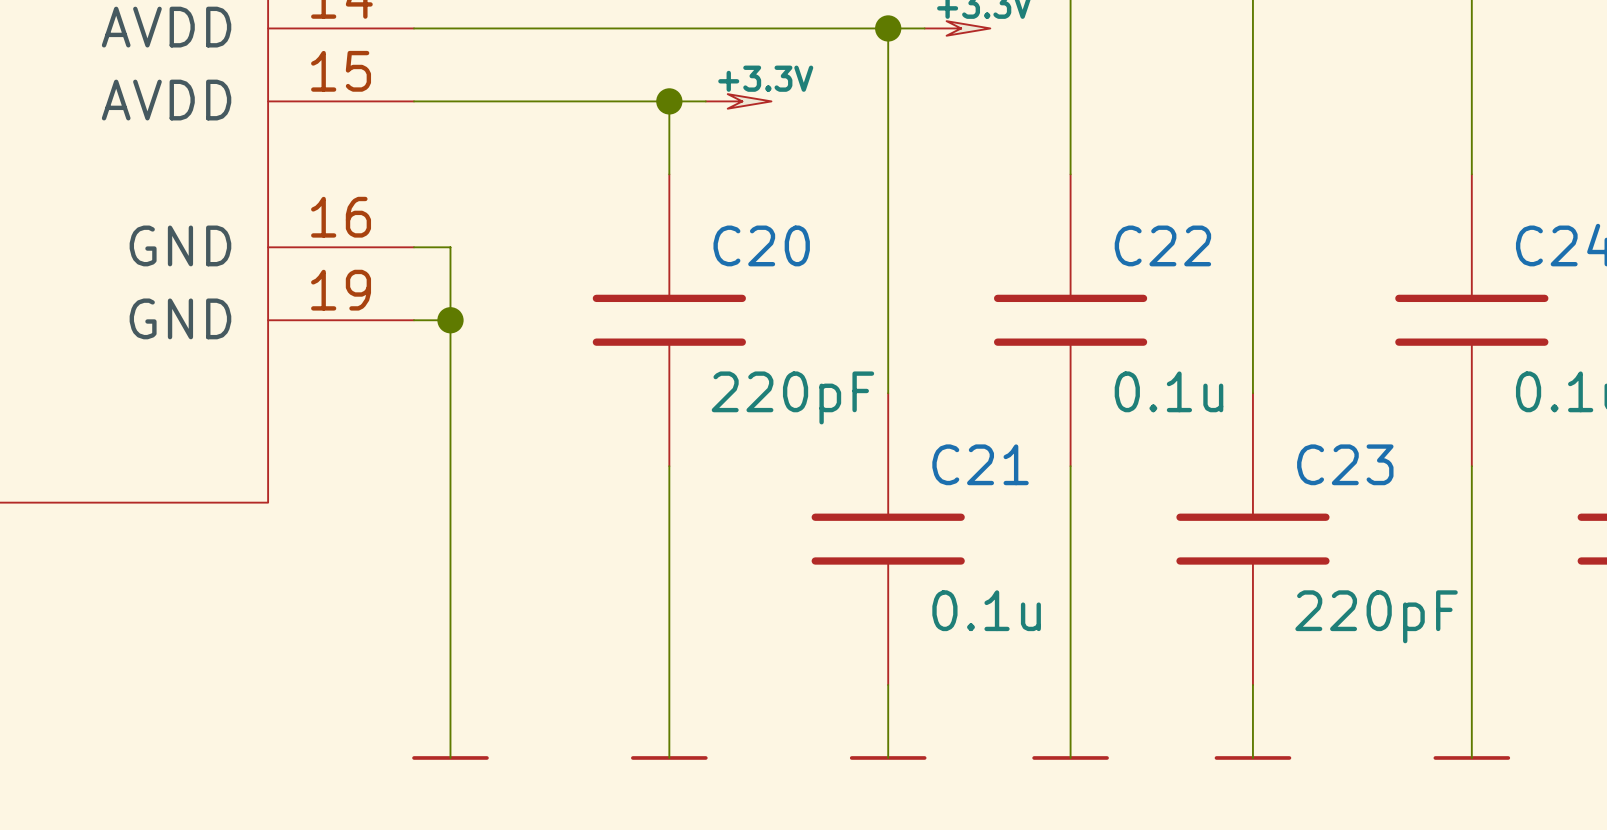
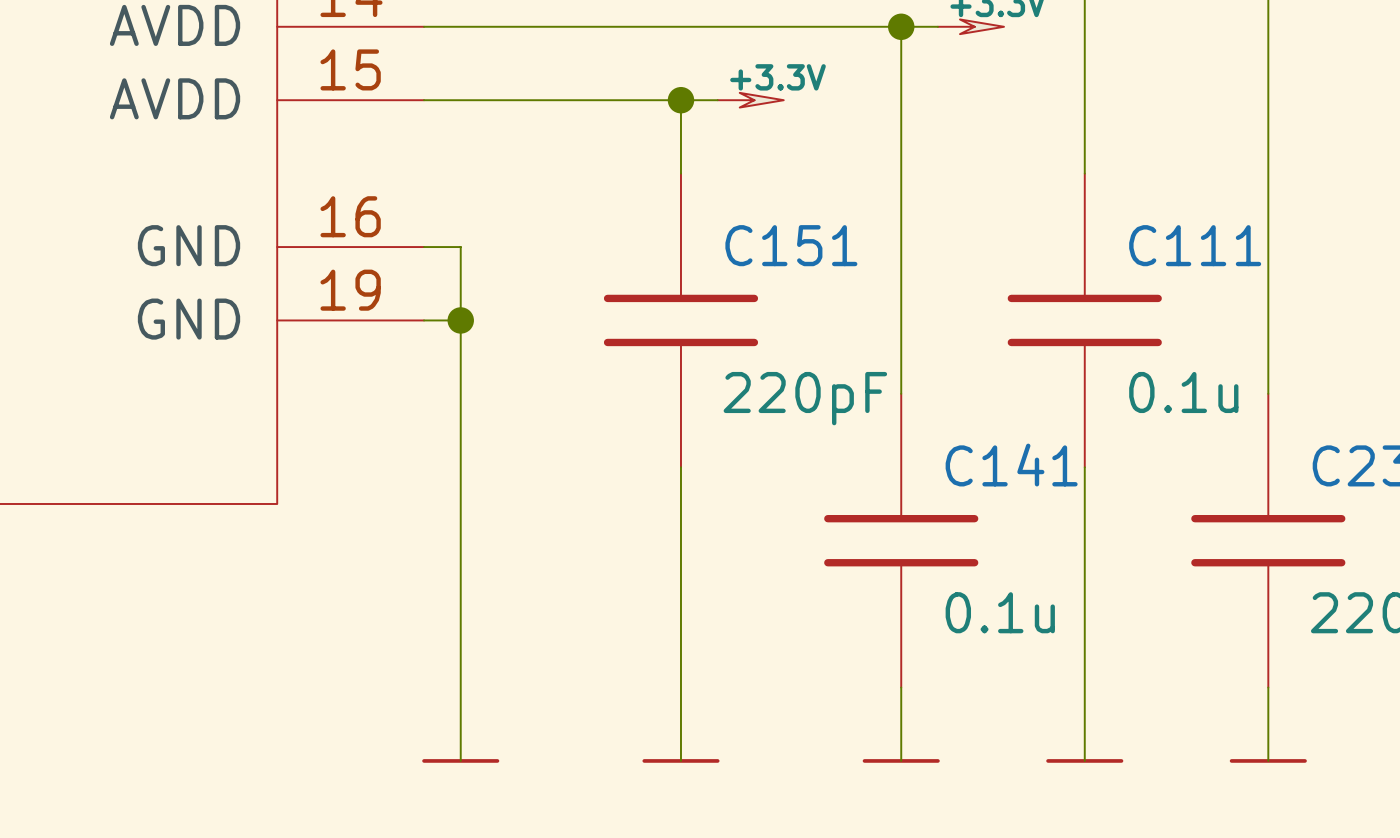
C20 name: C20 (761, 245) -> C151 (791, 245)
C22 name: C22 (1162, 245) -> C111 (1195, 245)
C21 name: C21 (980, 464) -> C141 (1011, 465)

